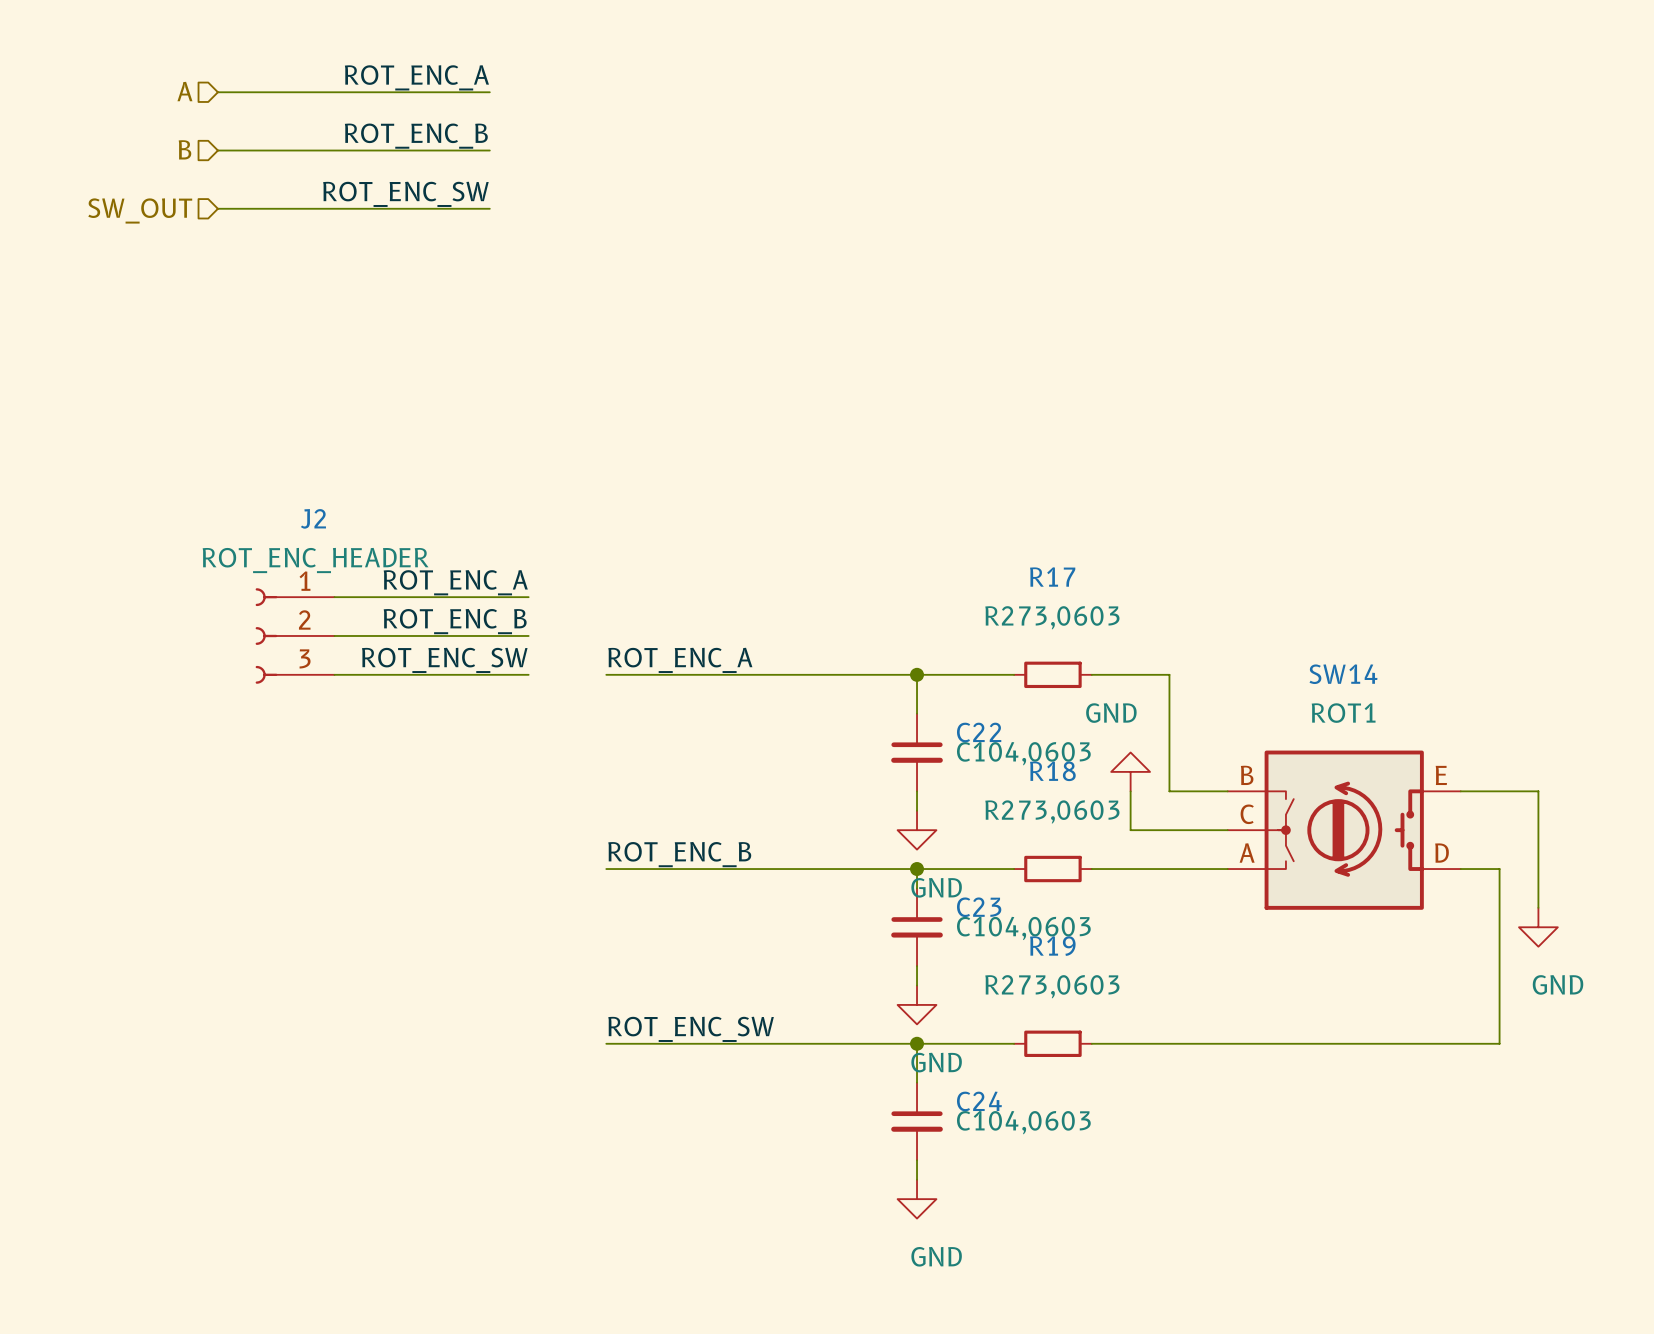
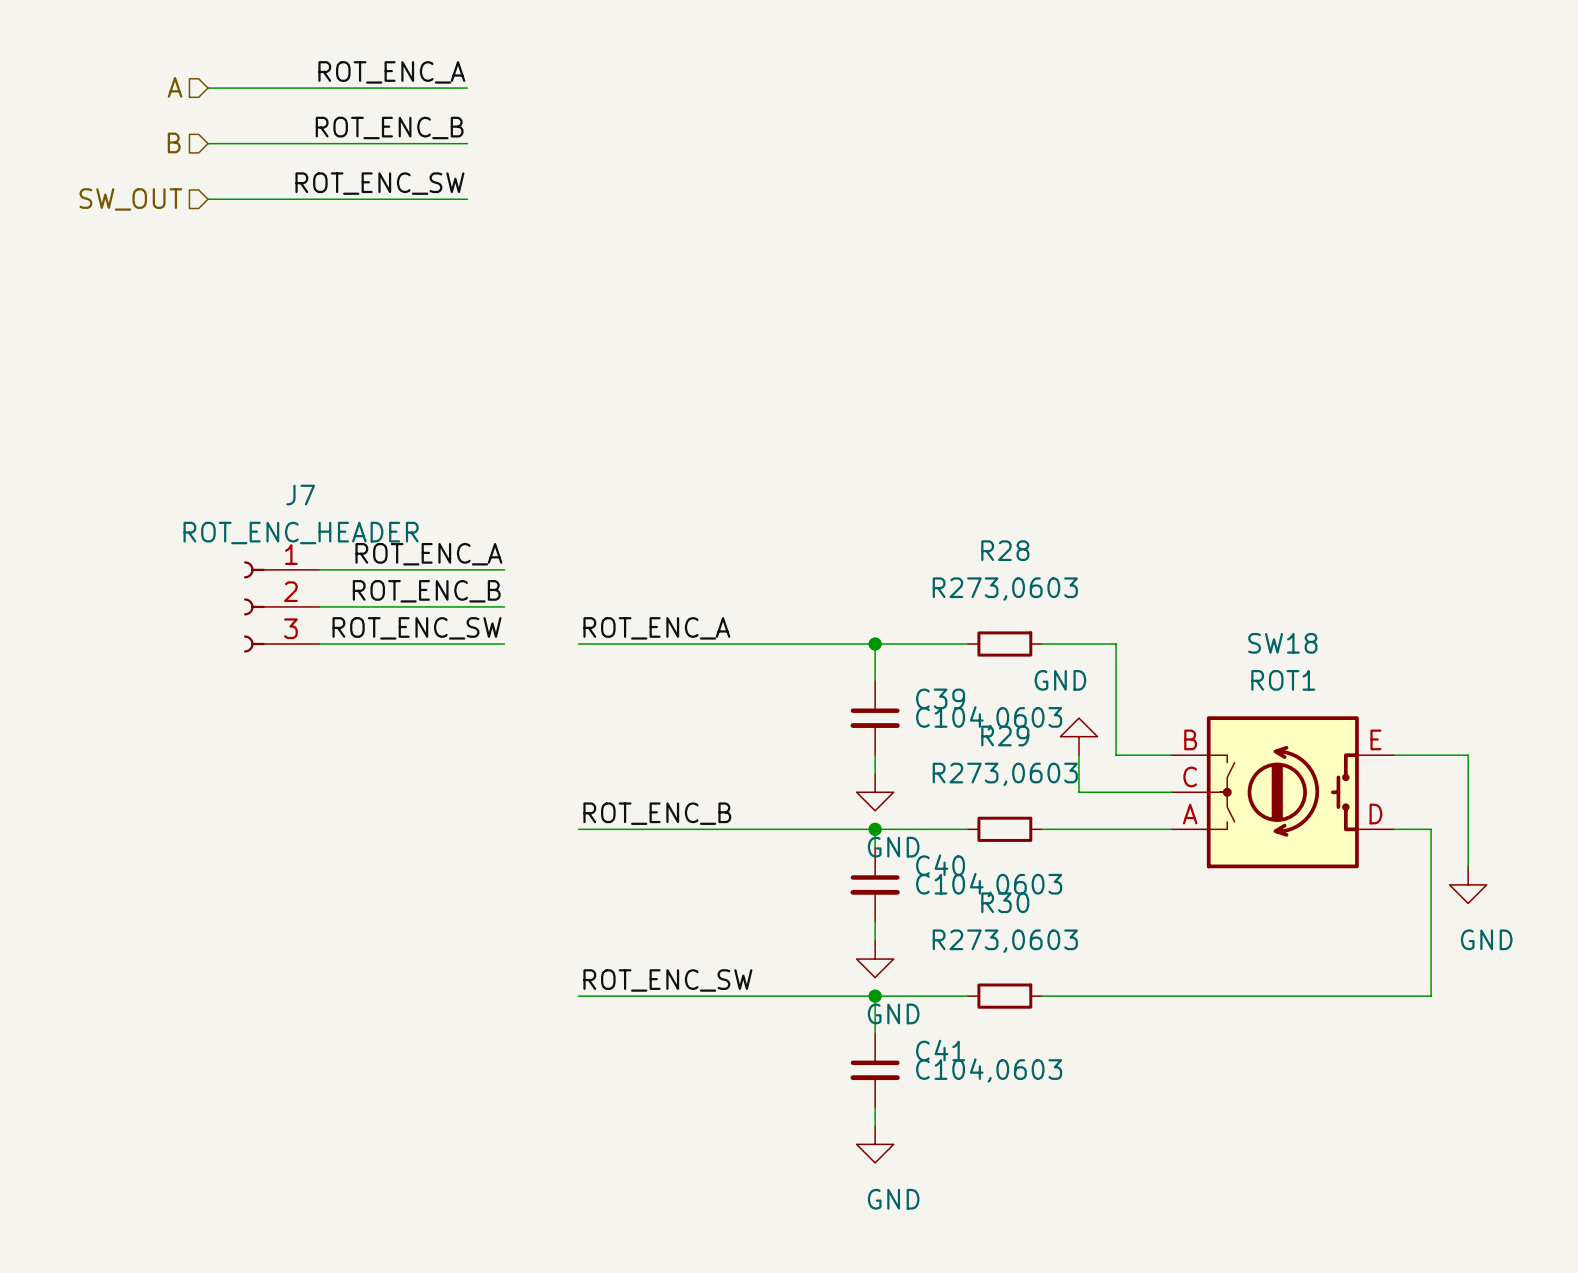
J2 name: J2 (313, 518) -> J7 (300, 495)
R17 name: R17 (1052, 577) -> R28 (1005, 550)
SW14 name: SW14 (1343, 674) -> SW18 (1282, 643)
C22 name: C22 (979, 732) -> C39 (940, 698)
R18 name: R18 (1052, 771) -> R29 (1005, 735)
C23 name: C23 (979, 907) -> C40 (940, 865)
R19 name: R19 (1052, 946) -> R30 (1005, 902)
C24 name: C24 (979, 1101) -> C41 (940, 1050)

